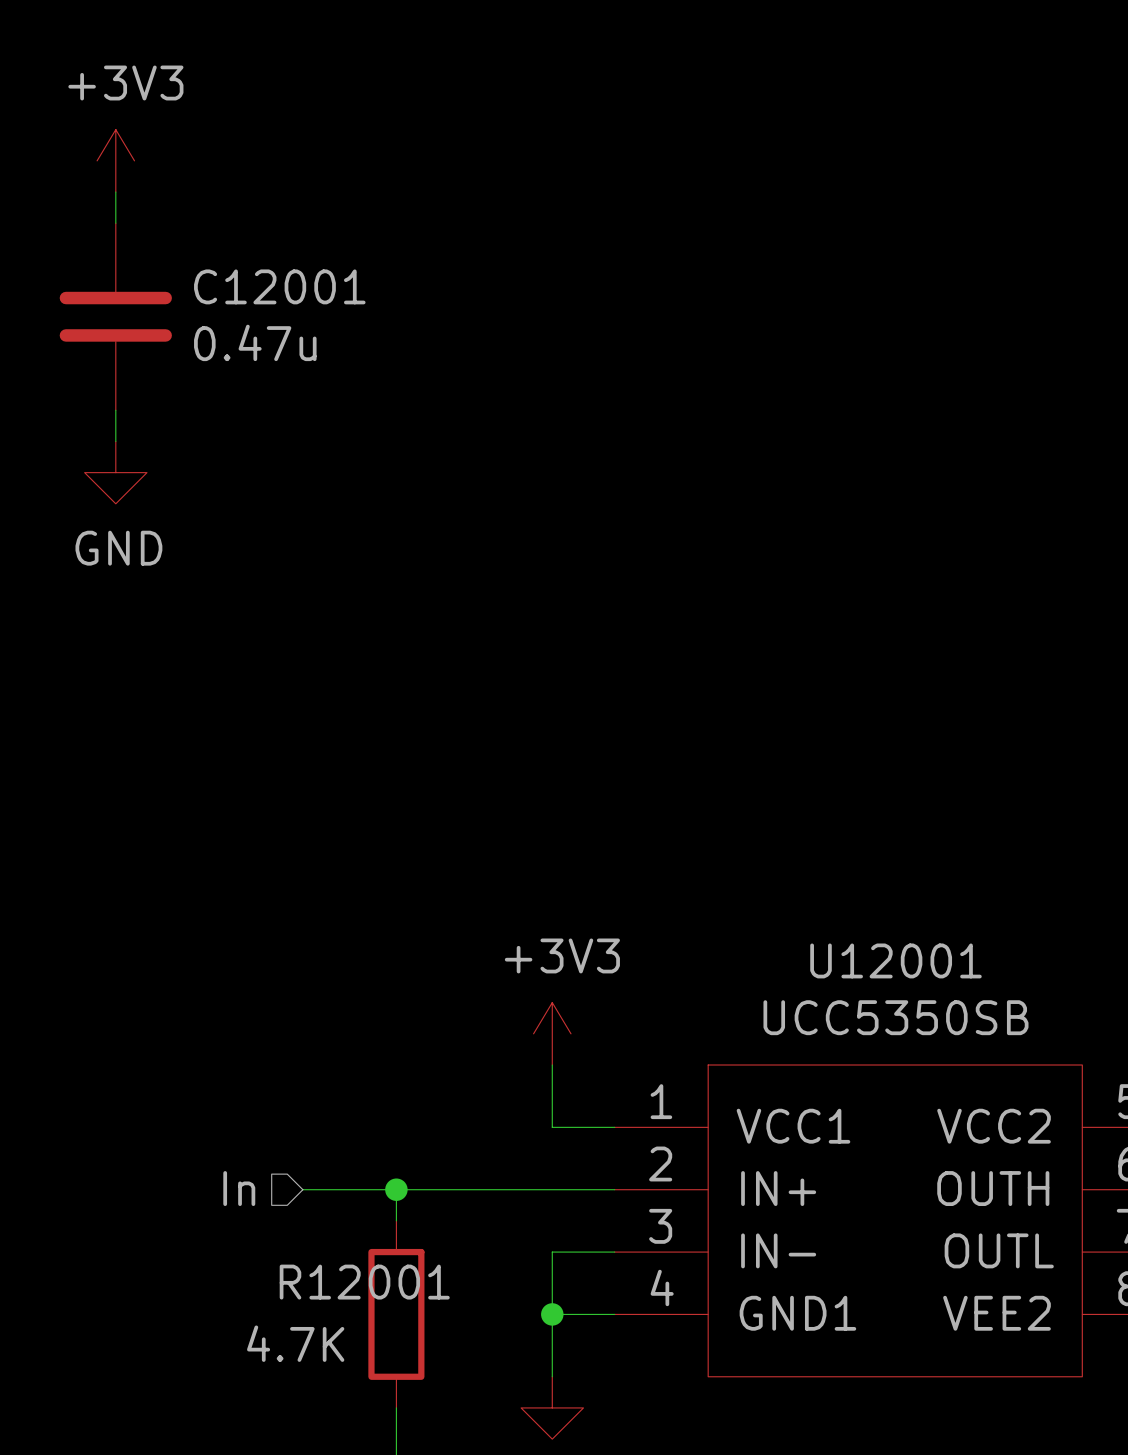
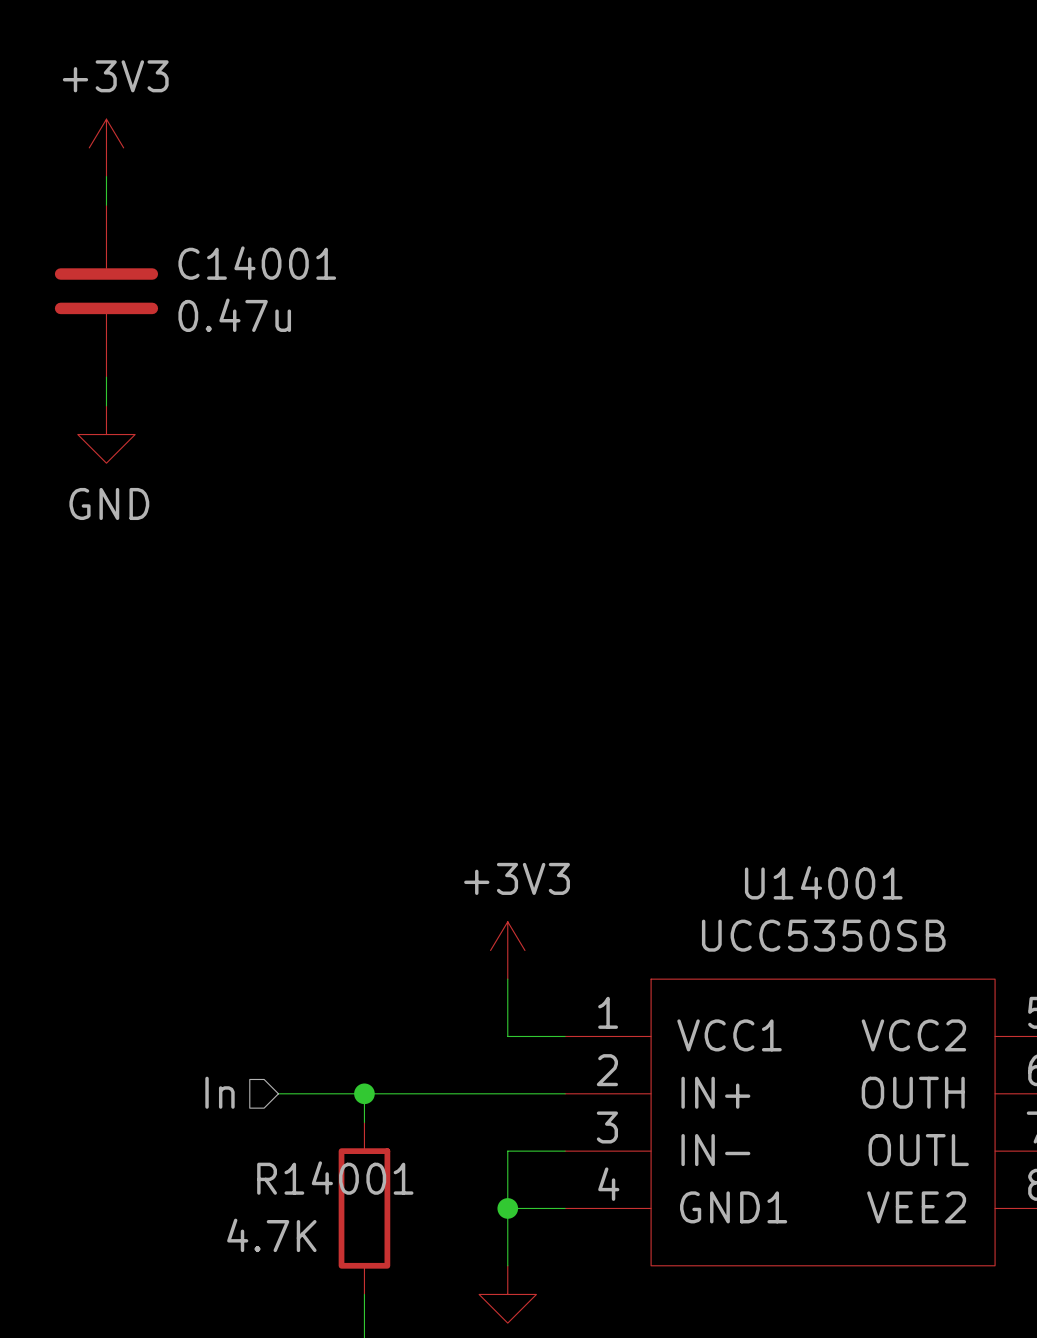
C12001 name: C12001 (279, 286) -> C14001 (257, 263)
U12001 name: U12001 (895, 960) -> U14001 (823, 882)
R12001 name: R12001 (364, 1282) -> R14001 (335, 1178)

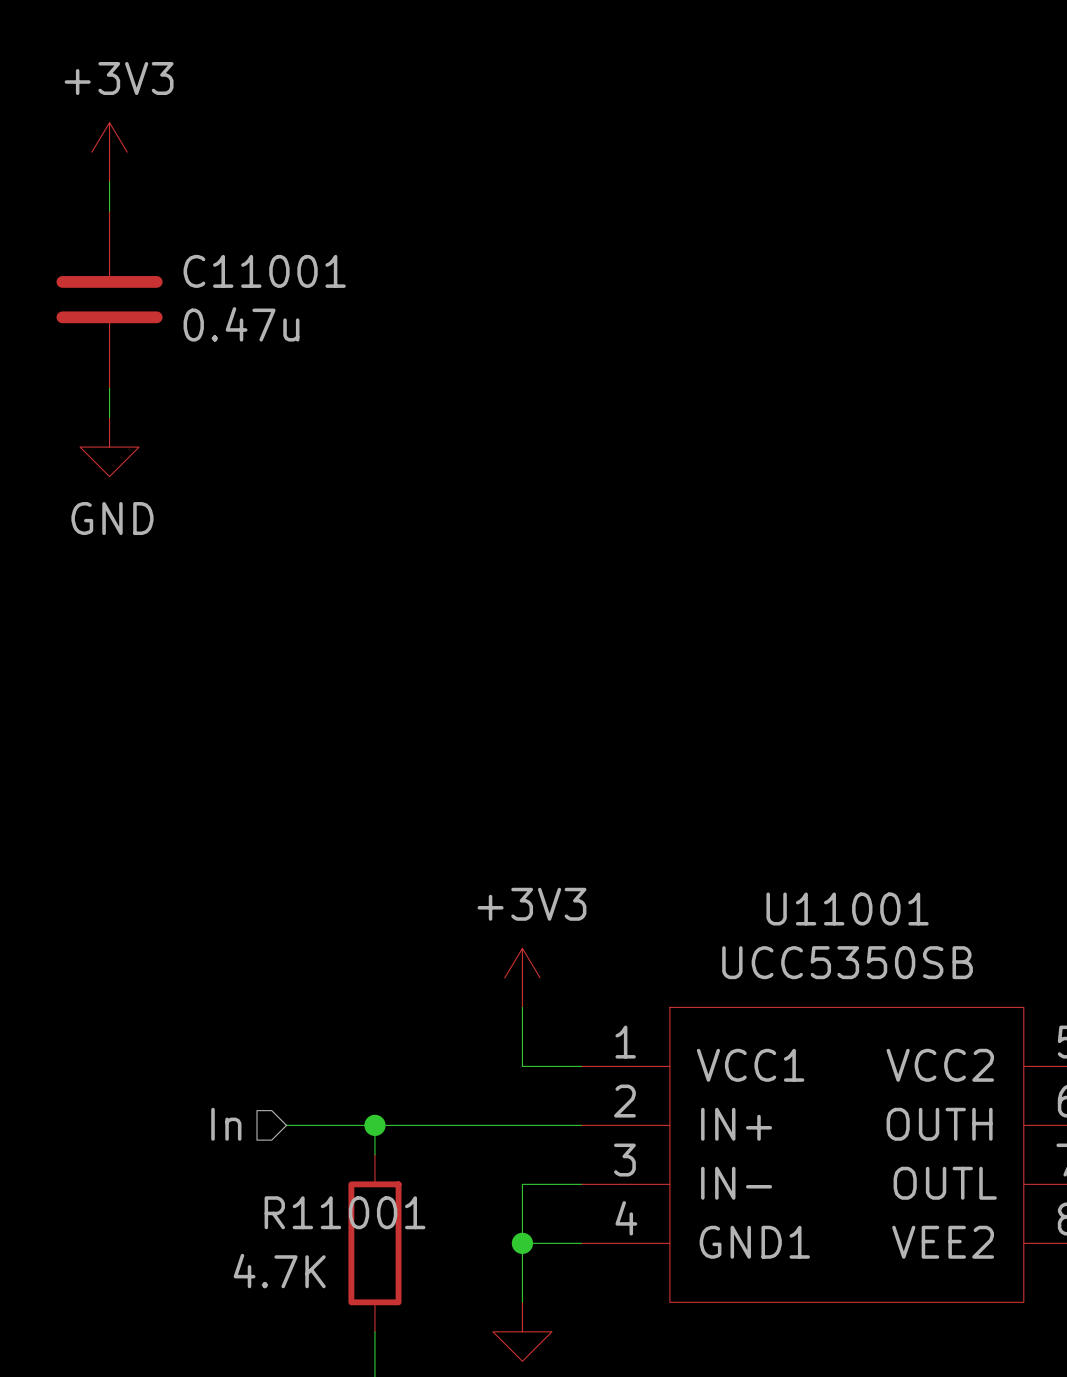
C14001 name: C14001 (257, 263) -> C11001 (264, 271)
U14001 name: U14001 (823, 882) -> U11001 (847, 908)
R14001 name: R14001 (335, 1178) -> R11001 (345, 1212)

